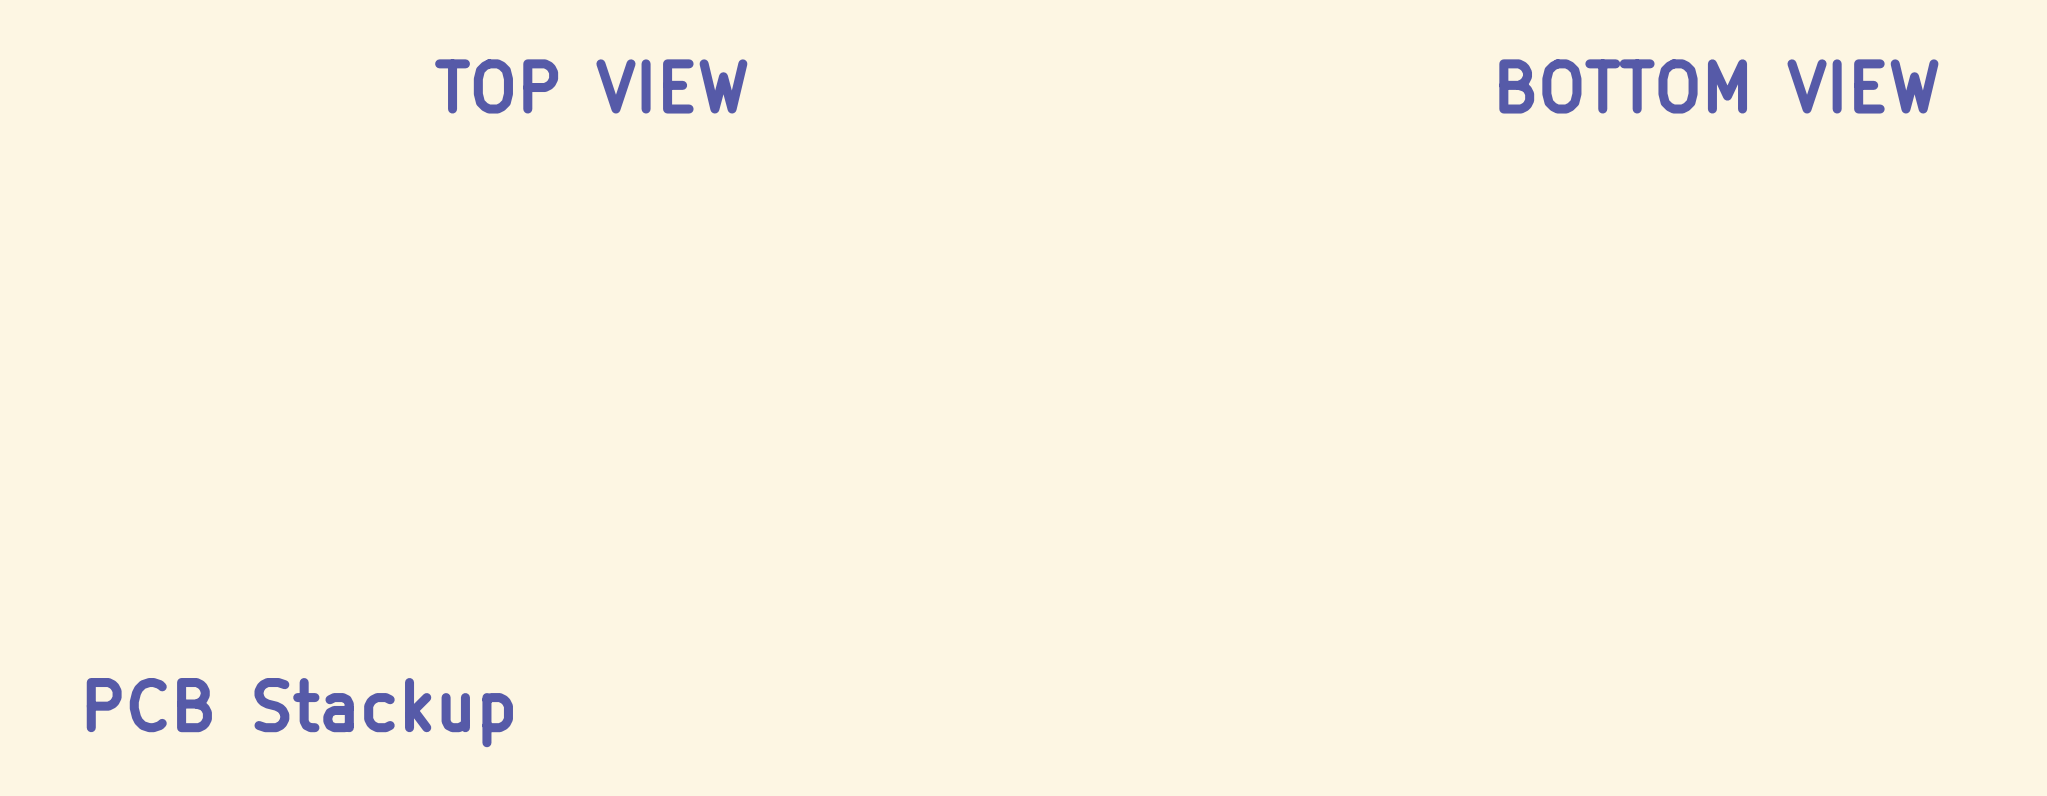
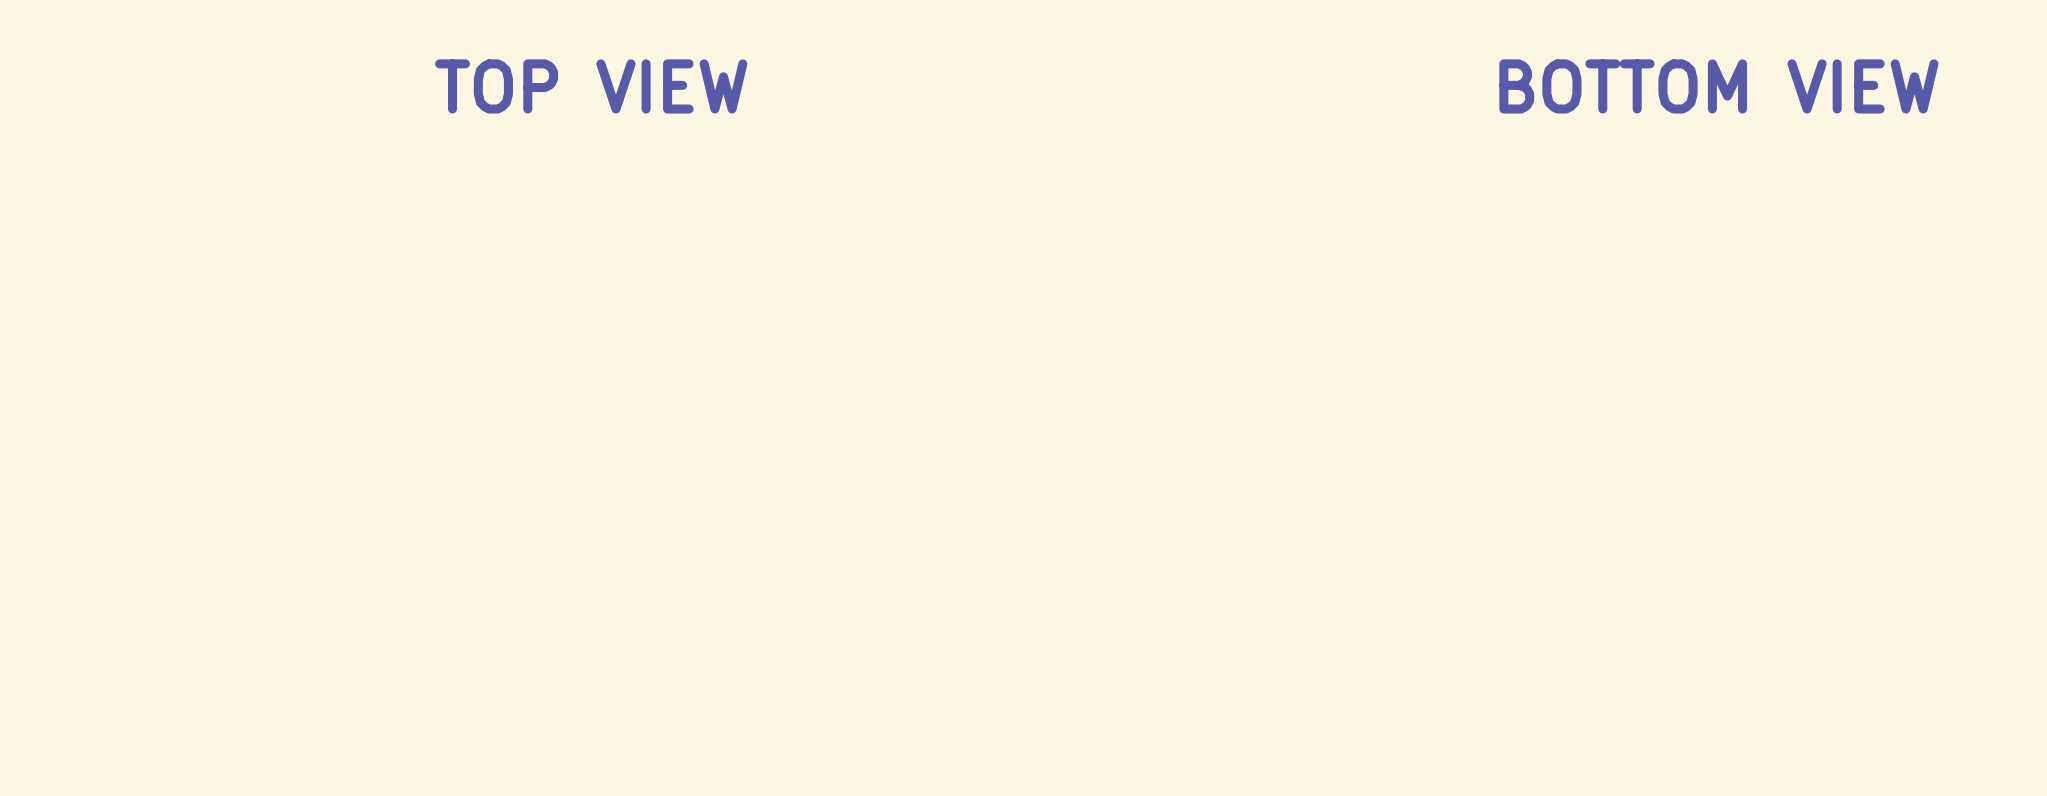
text: PCB Stackup (299, 712) -> none

